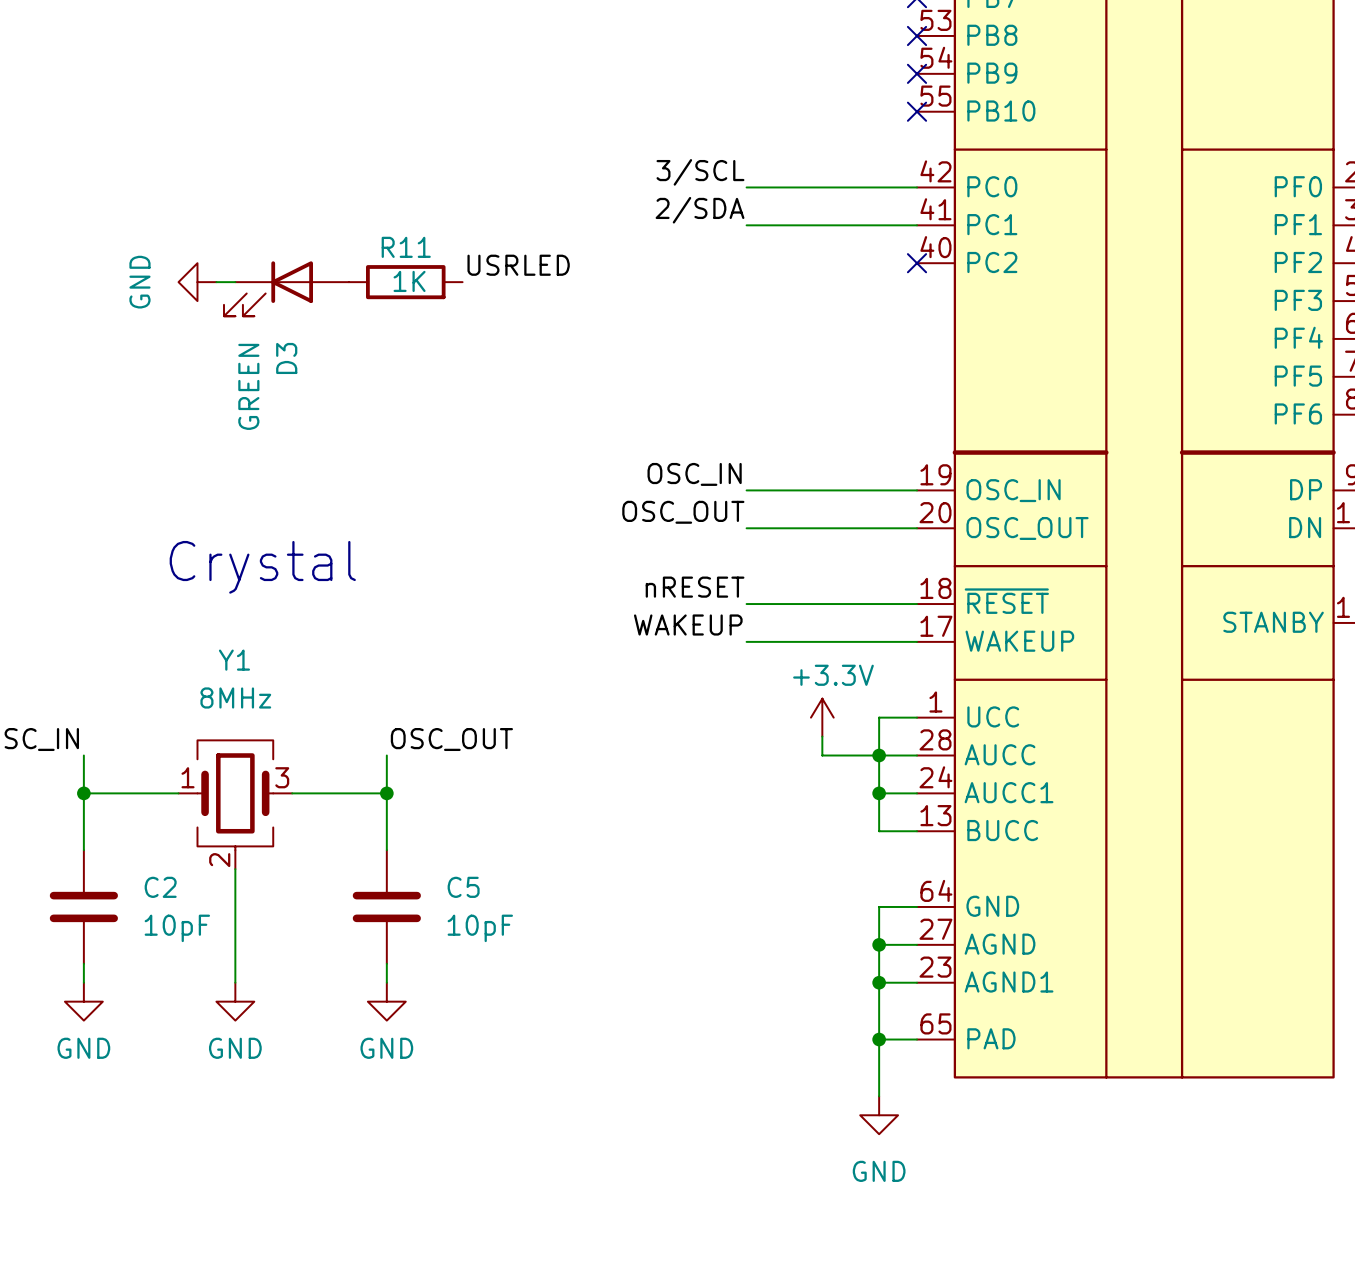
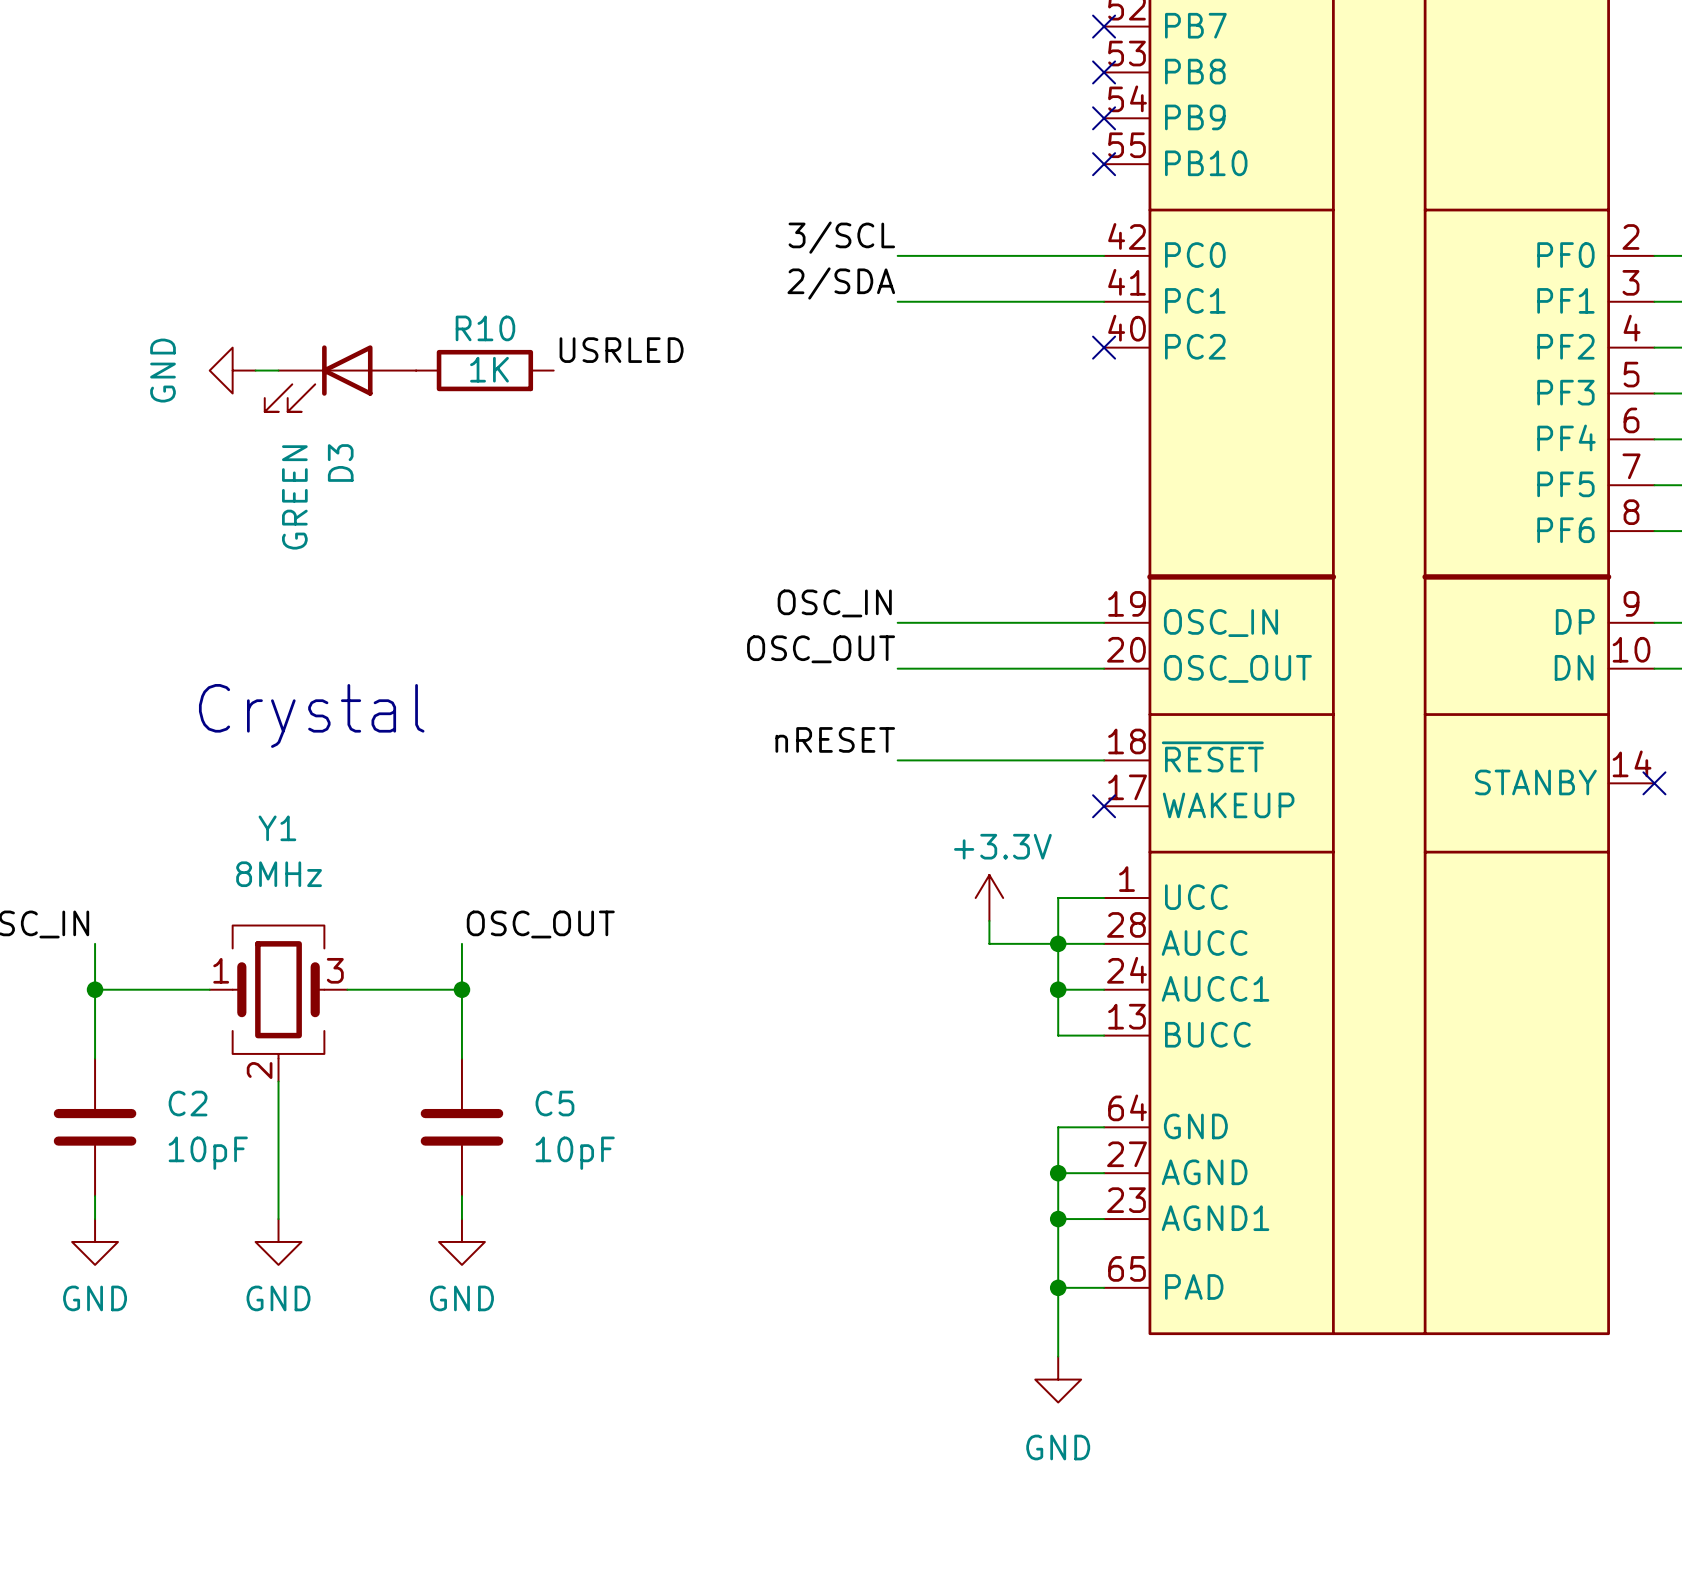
R11 name: R11 (406, 247) -> R10 (485, 328)
label: WAKEUP (688, 625) -> none
wire: (746, 641) (917, 641) -> none
no-connect mark: none -> (1104, 806)

